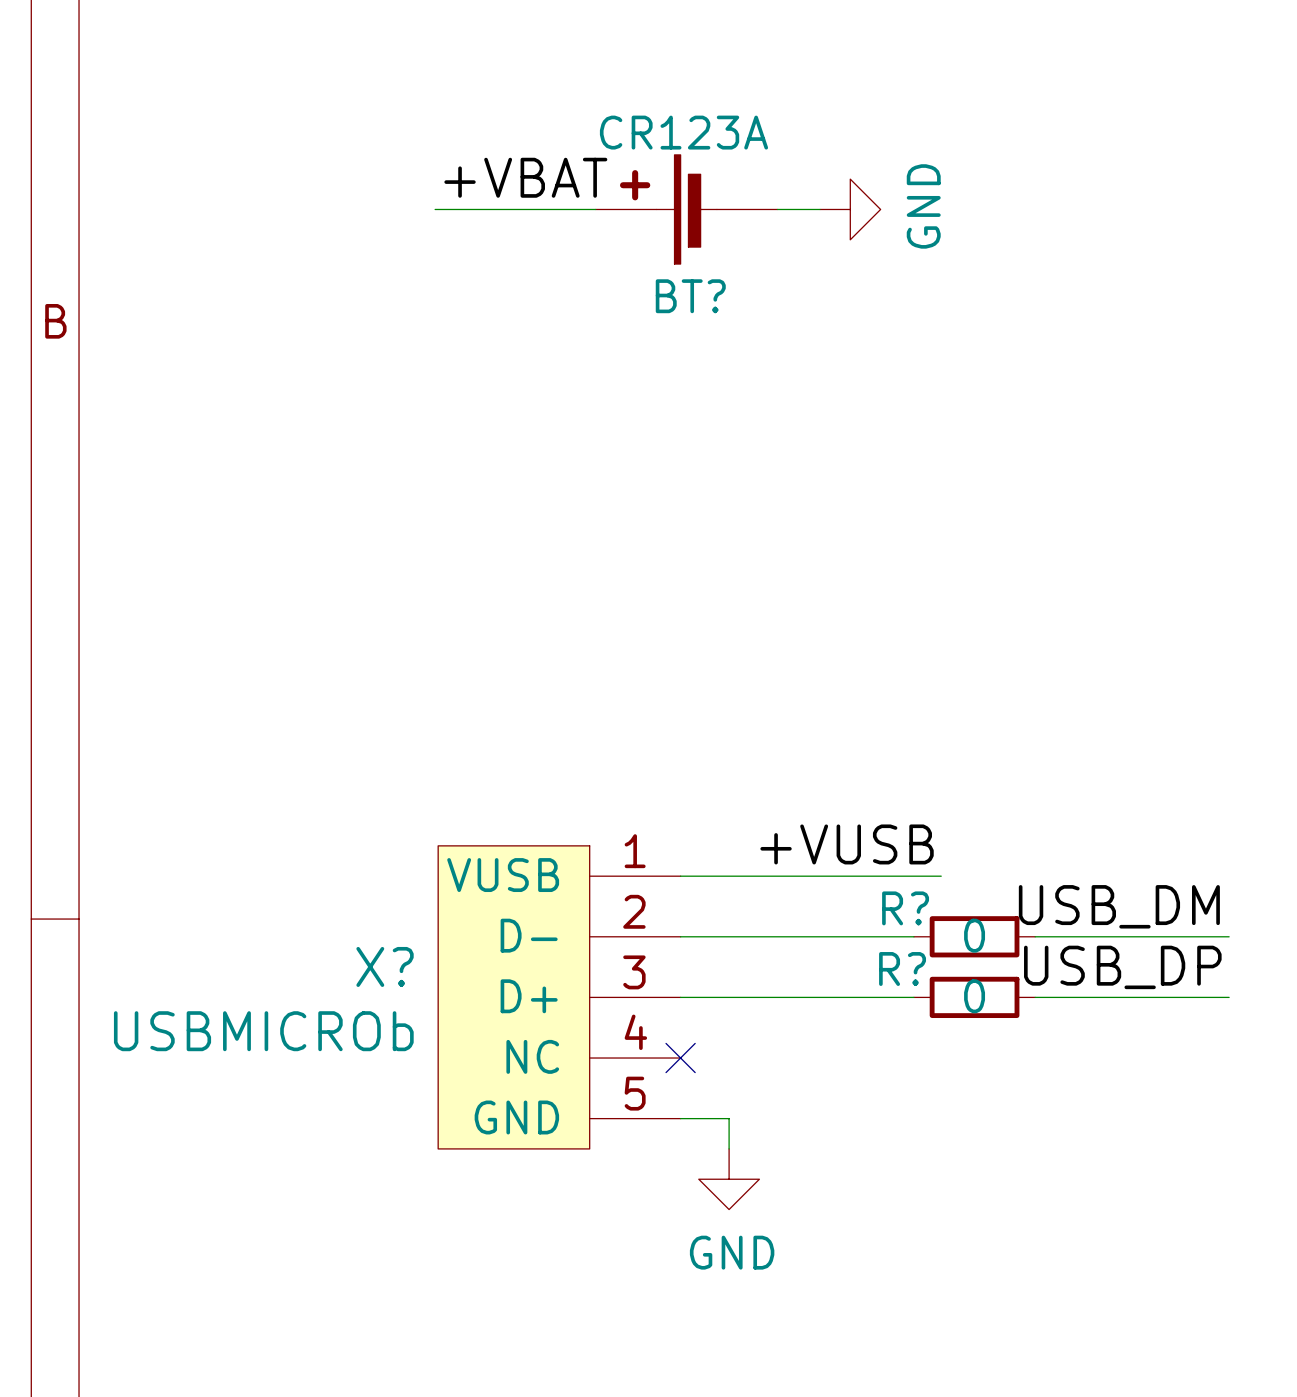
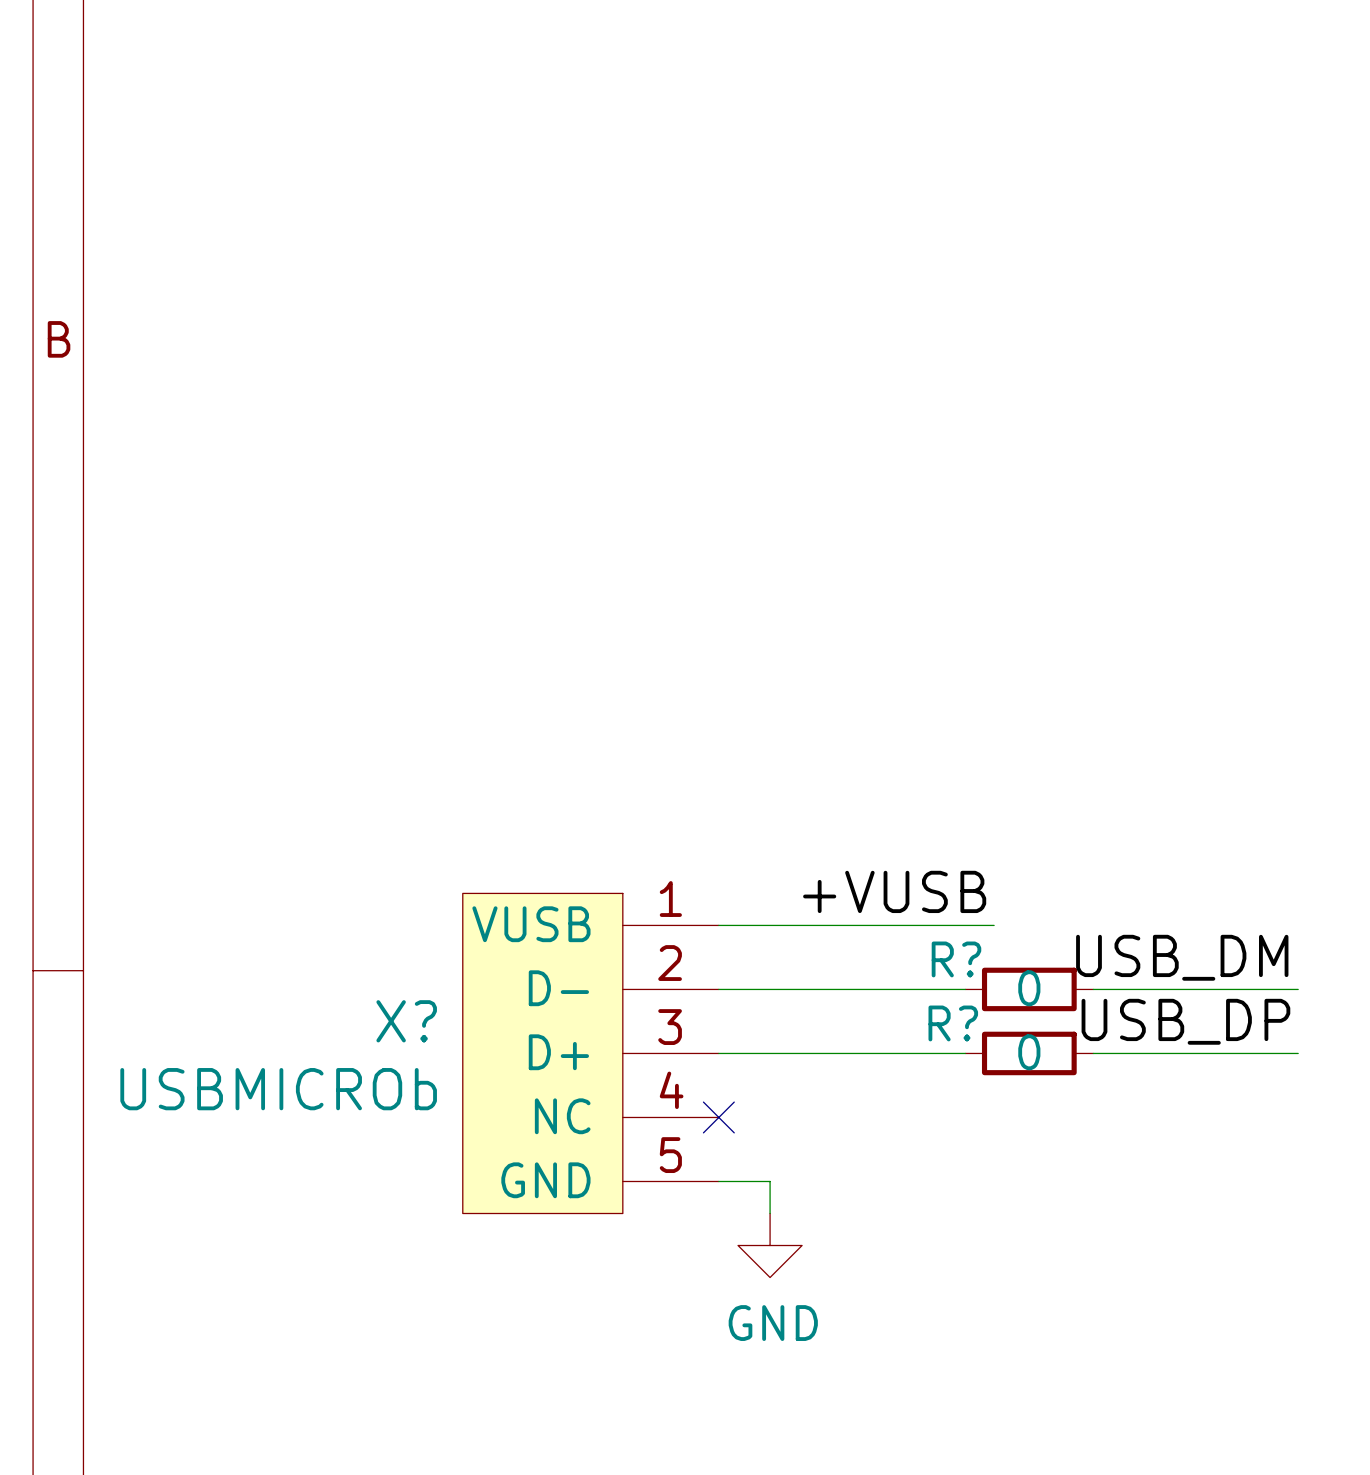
label: +VBAT (525, 177) -> none
wire: (435, 209) (595, 209) -> none
BT?: CR123A (686, 209) -> none
wire: (777, 209) (820, 209) -> none
power symbol: GND (850, 209) -> none

